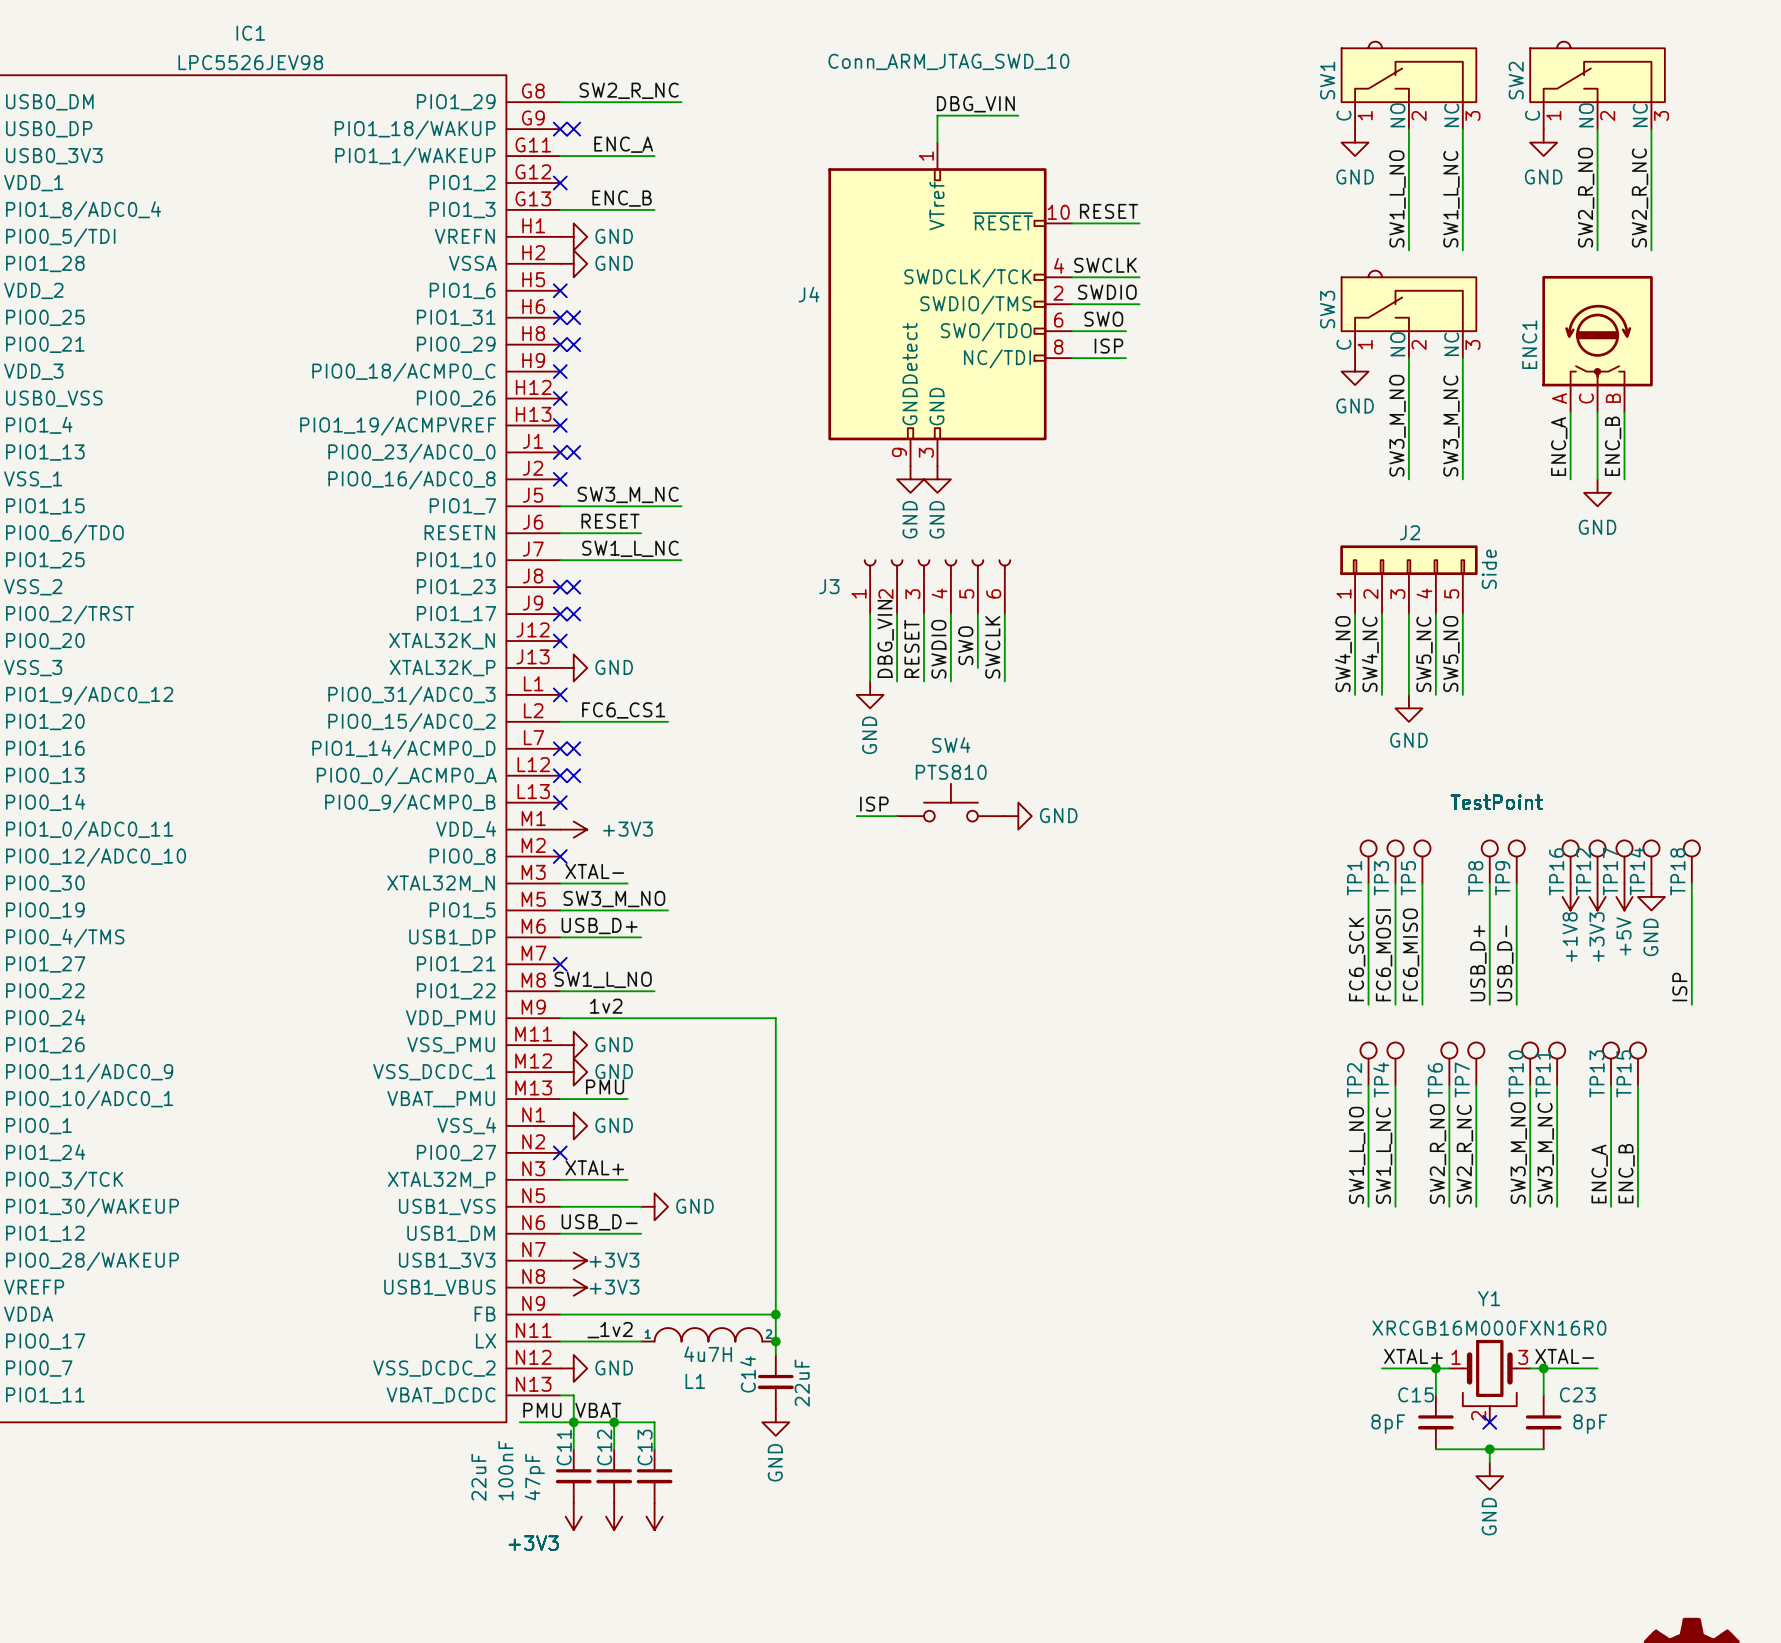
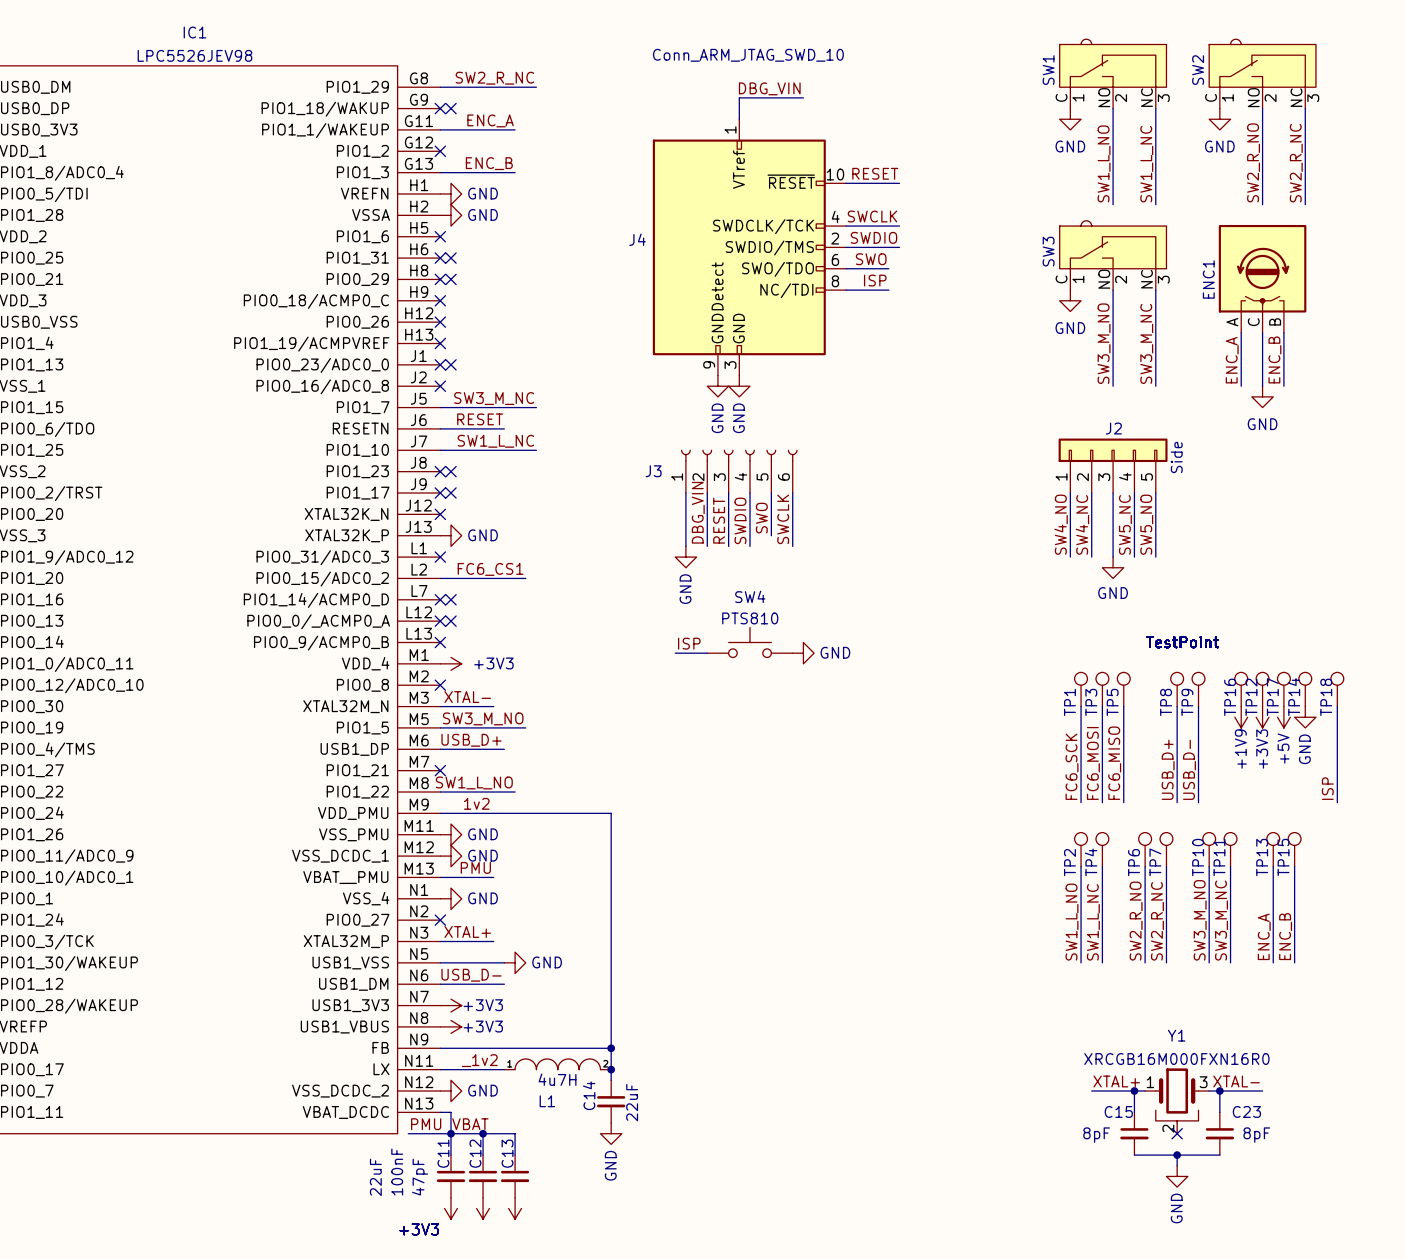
power symbol: +1V8 (1570, 896) -> +1V9 (1241, 717)

